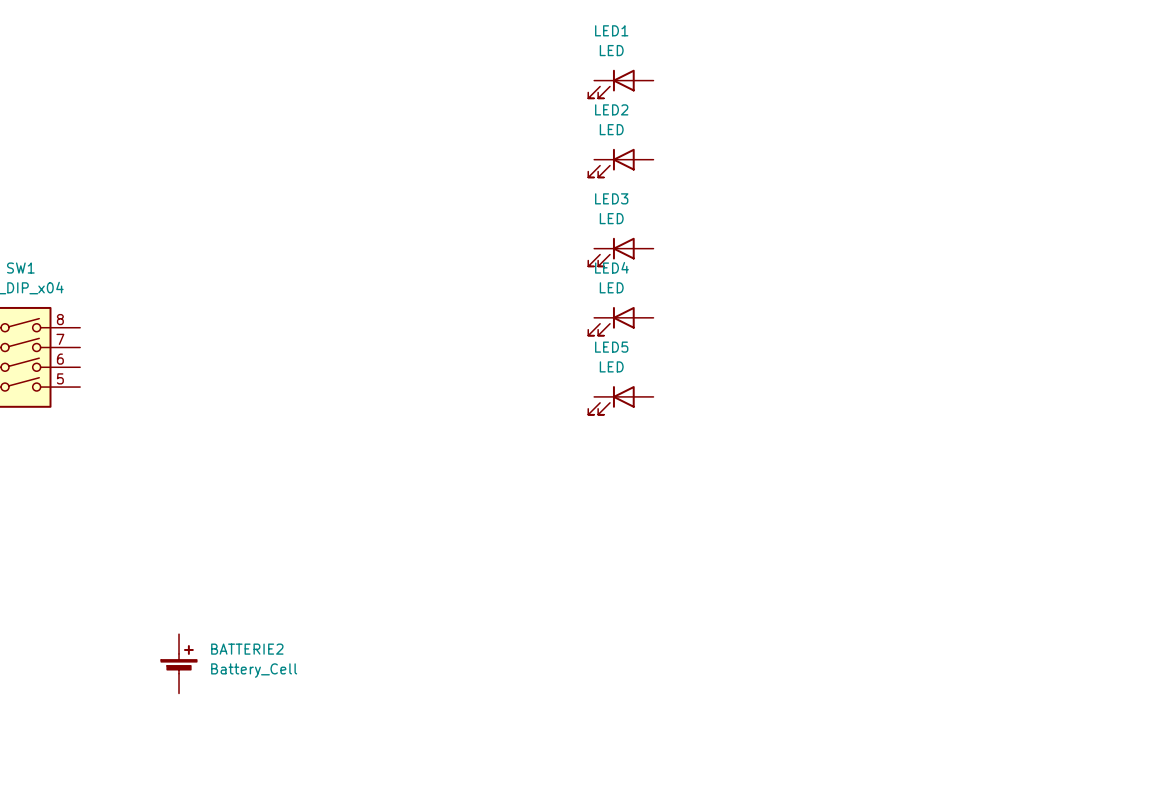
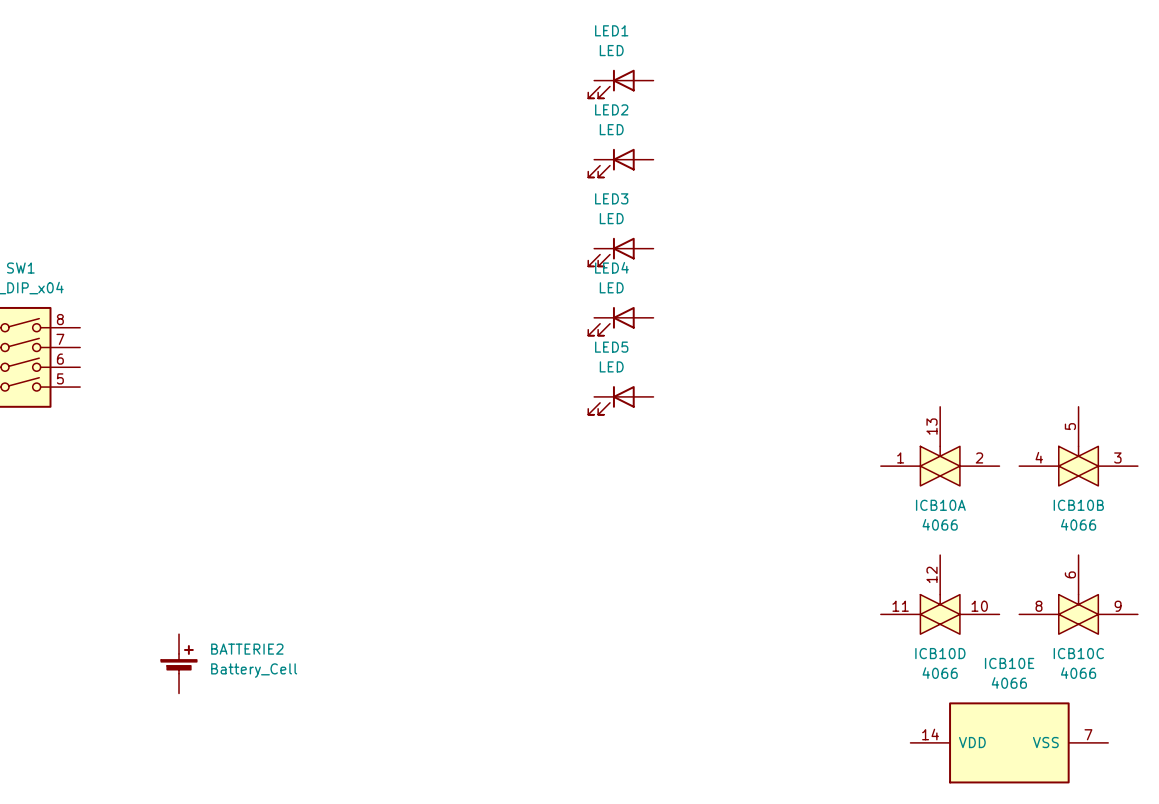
ICB10A: none -> 4066 (940, 446)
ICB10B: none -> 4066 (1078, 446)
ICB10D: none -> 4066 (940, 594)
ICB10C: none -> 4066 (1078, 594)
ICB10E: none -> 4066 (1009, 742)

